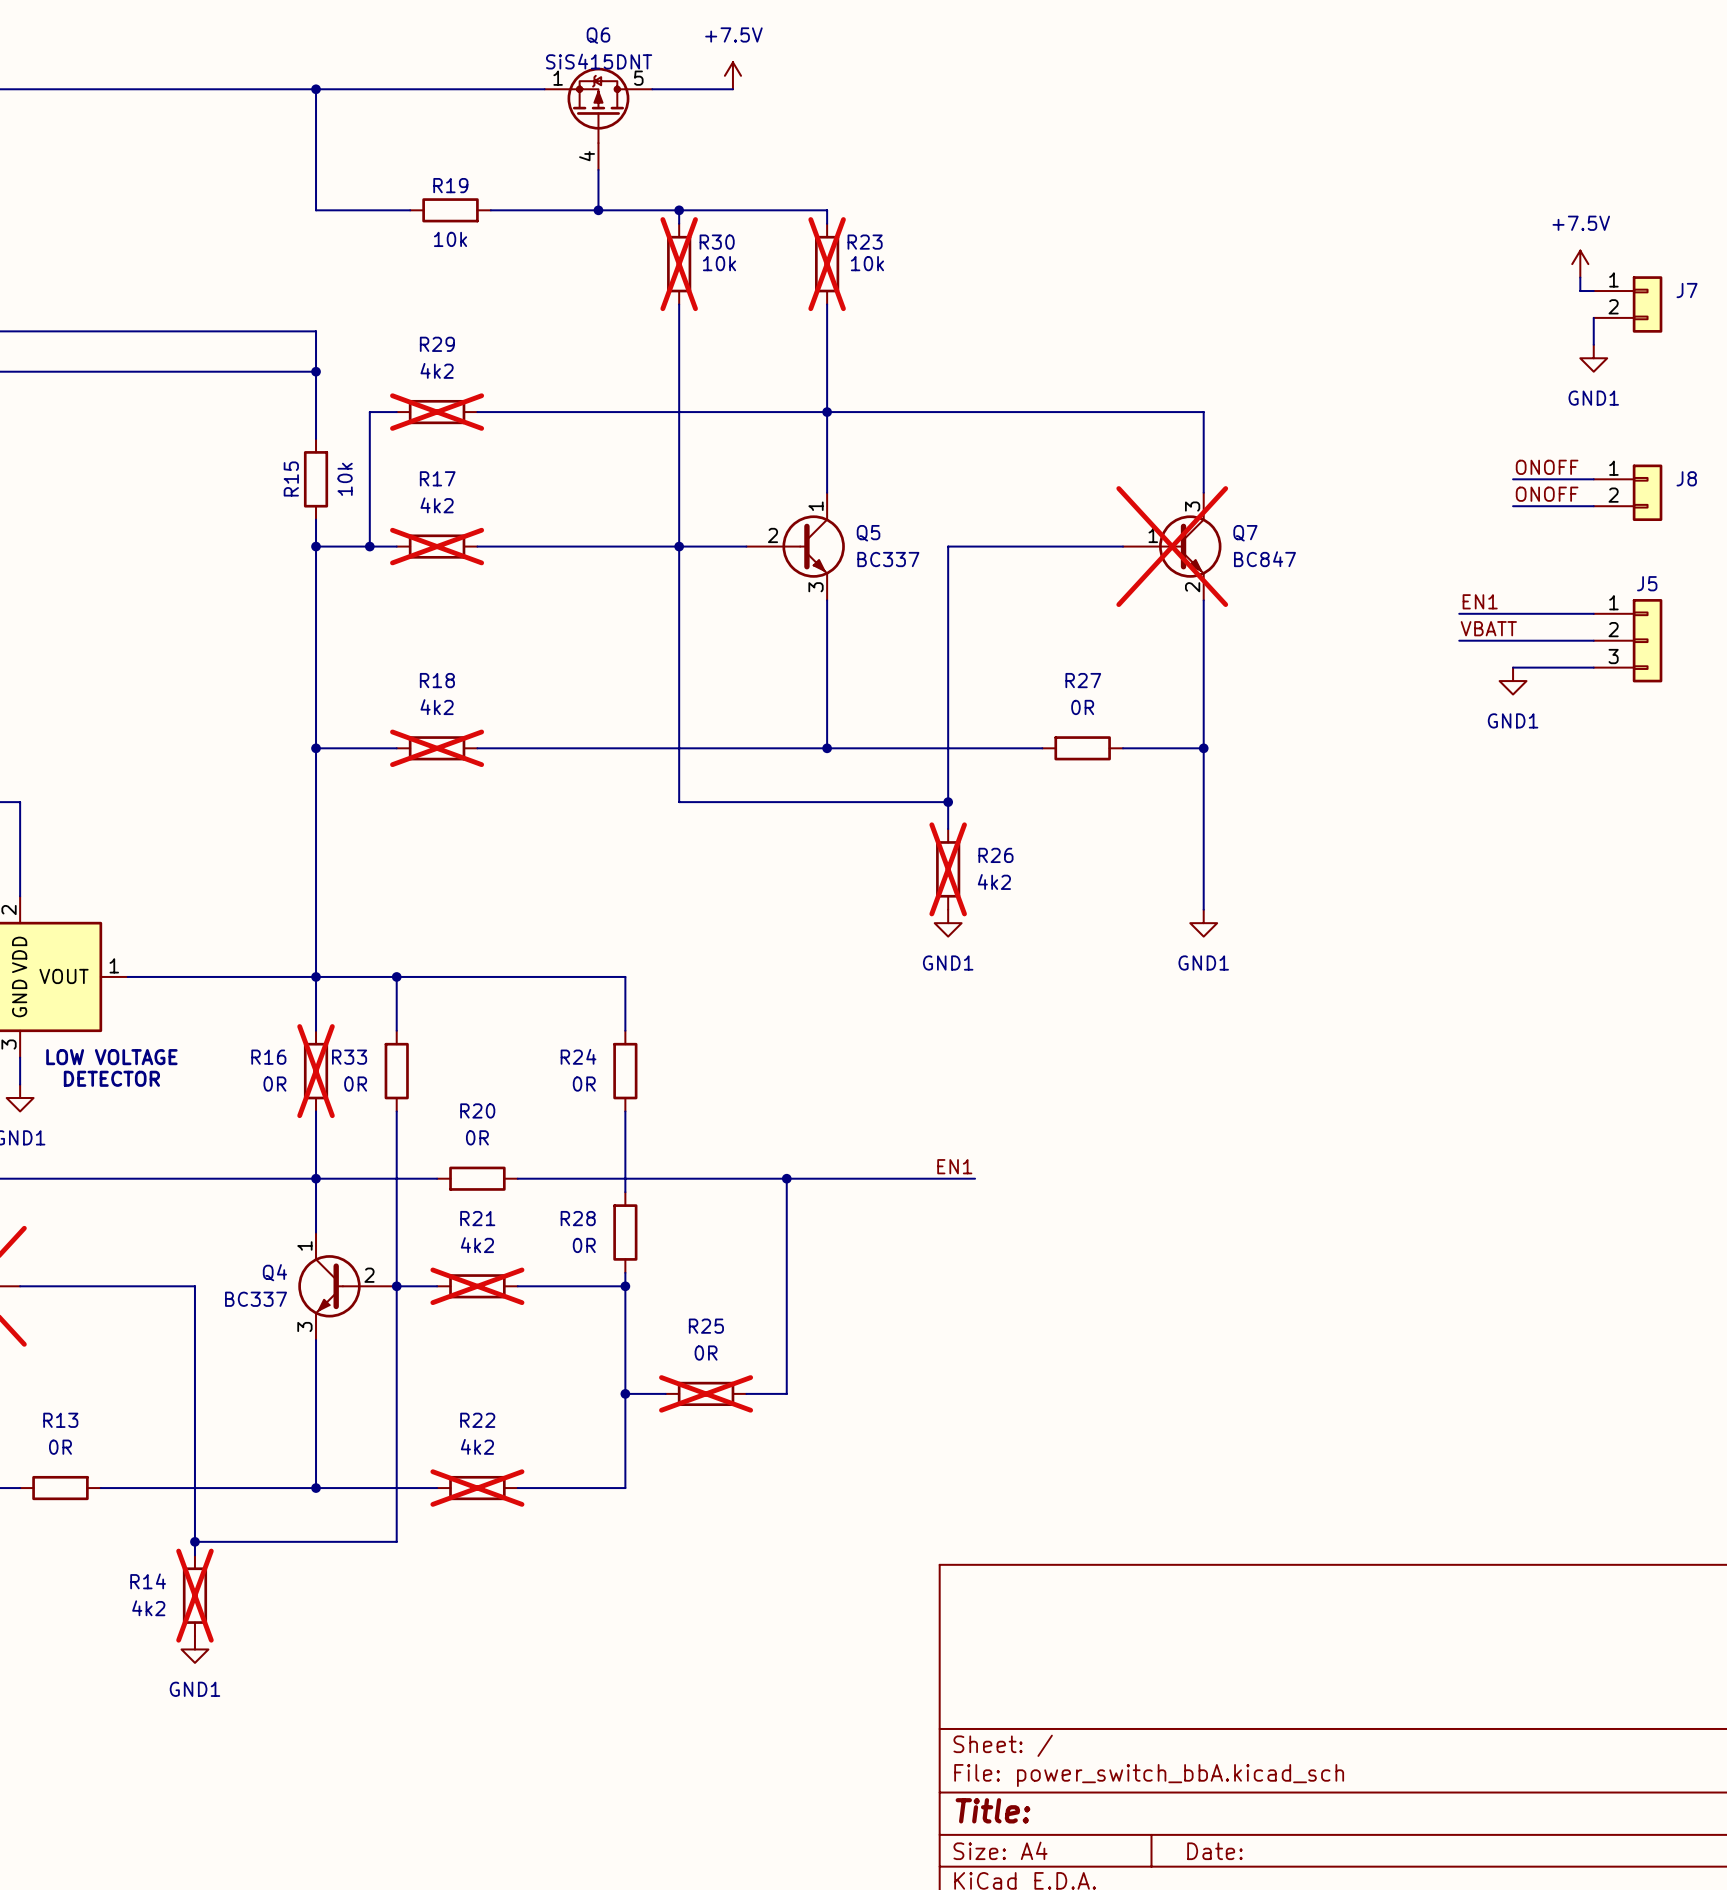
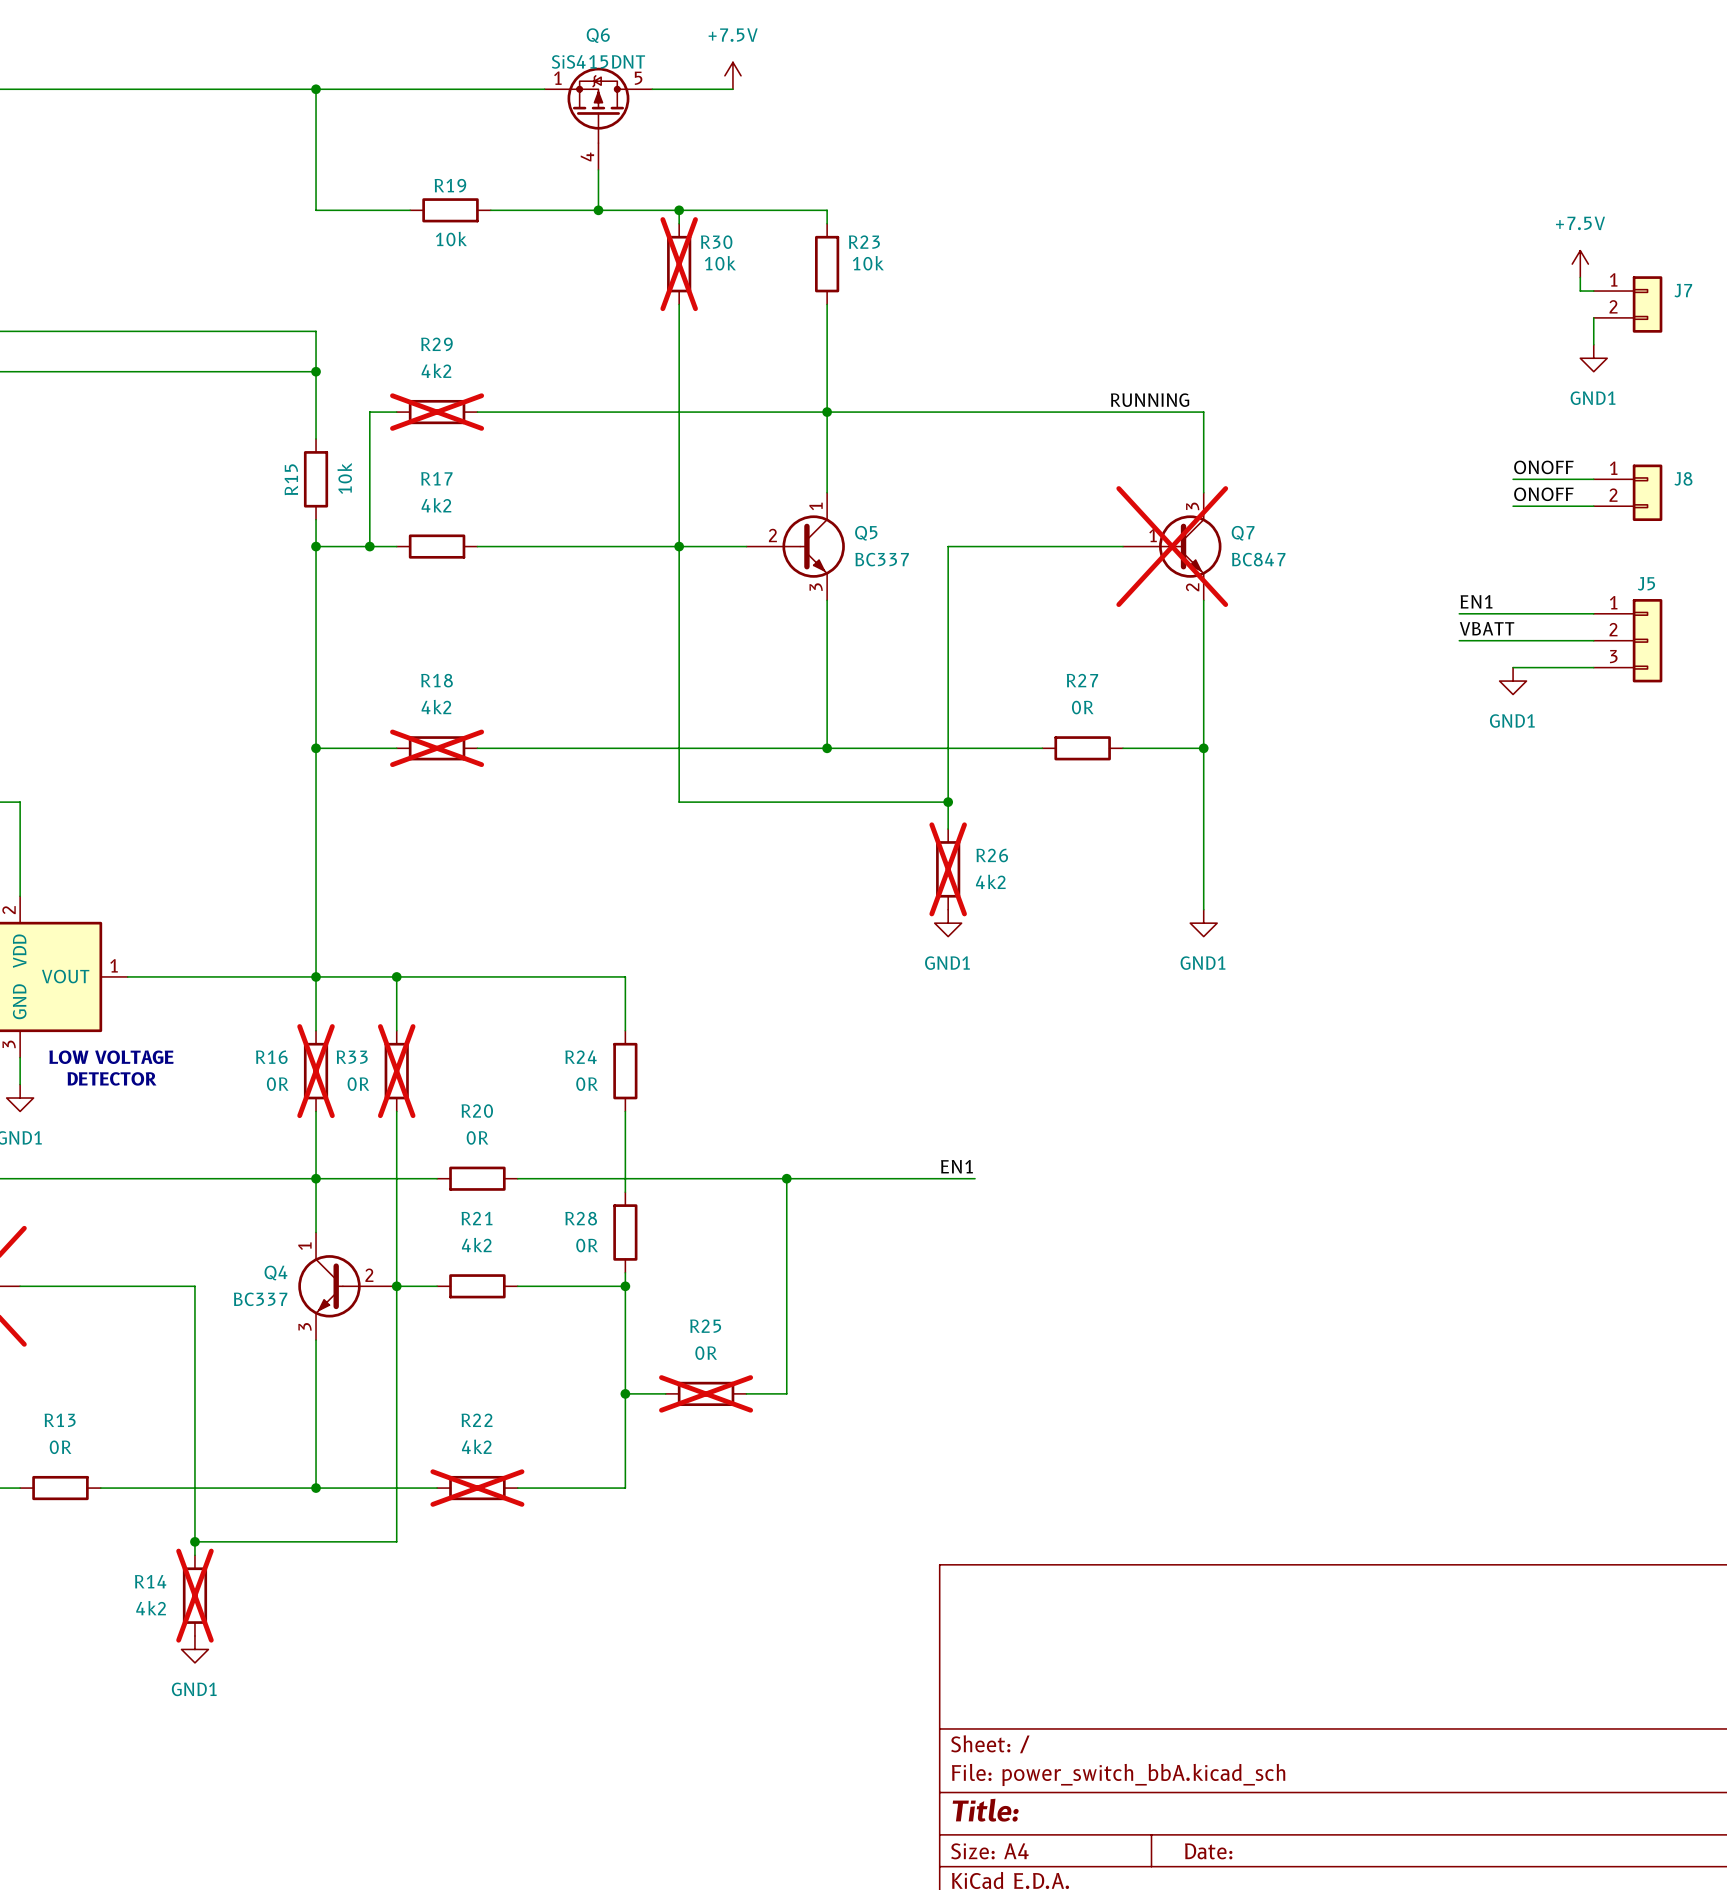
R23 do-not-place cross: (827, 264) -> none
label: none -> RUNNING (1150, 400)
R17 do-not-place cross: (437, 546) -> none
R33 do-not-place cross: none -> (396, 1071)
R21 do-not-place cross: (477, 1286) -> none

